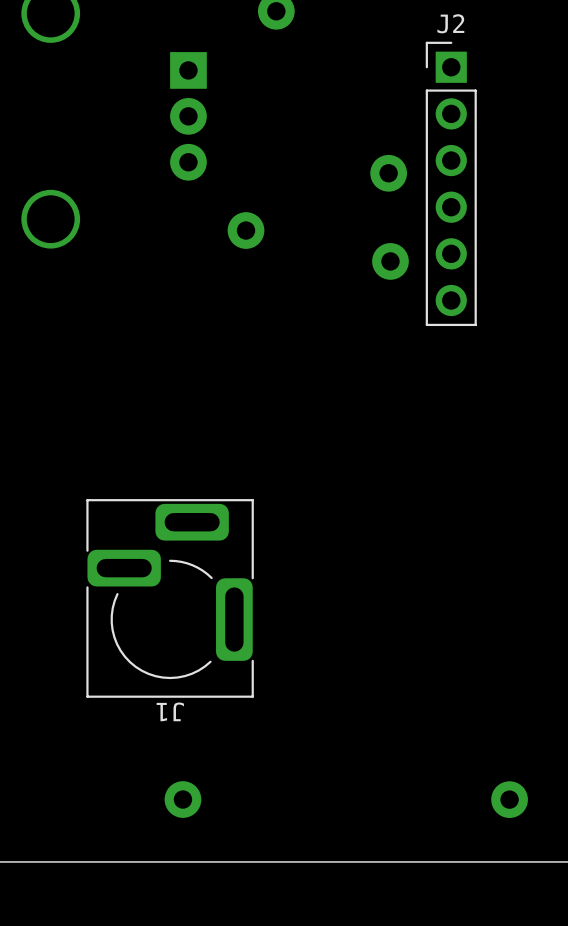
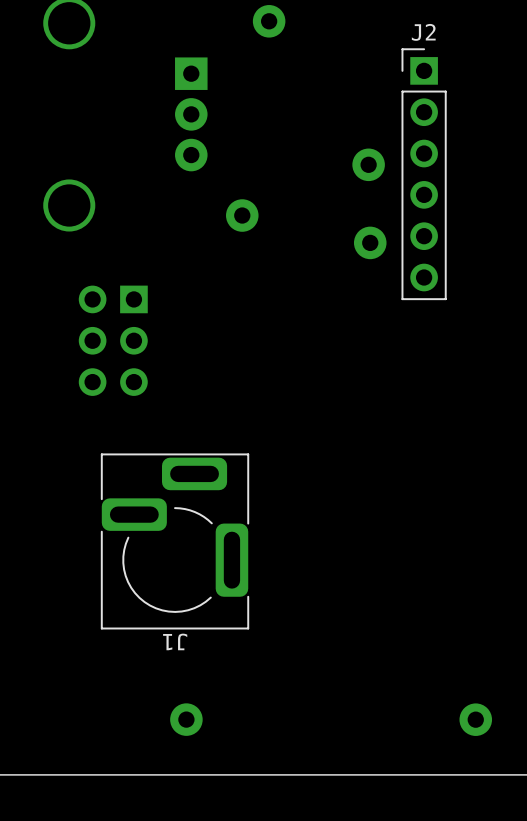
part: none -> (113, 340)

